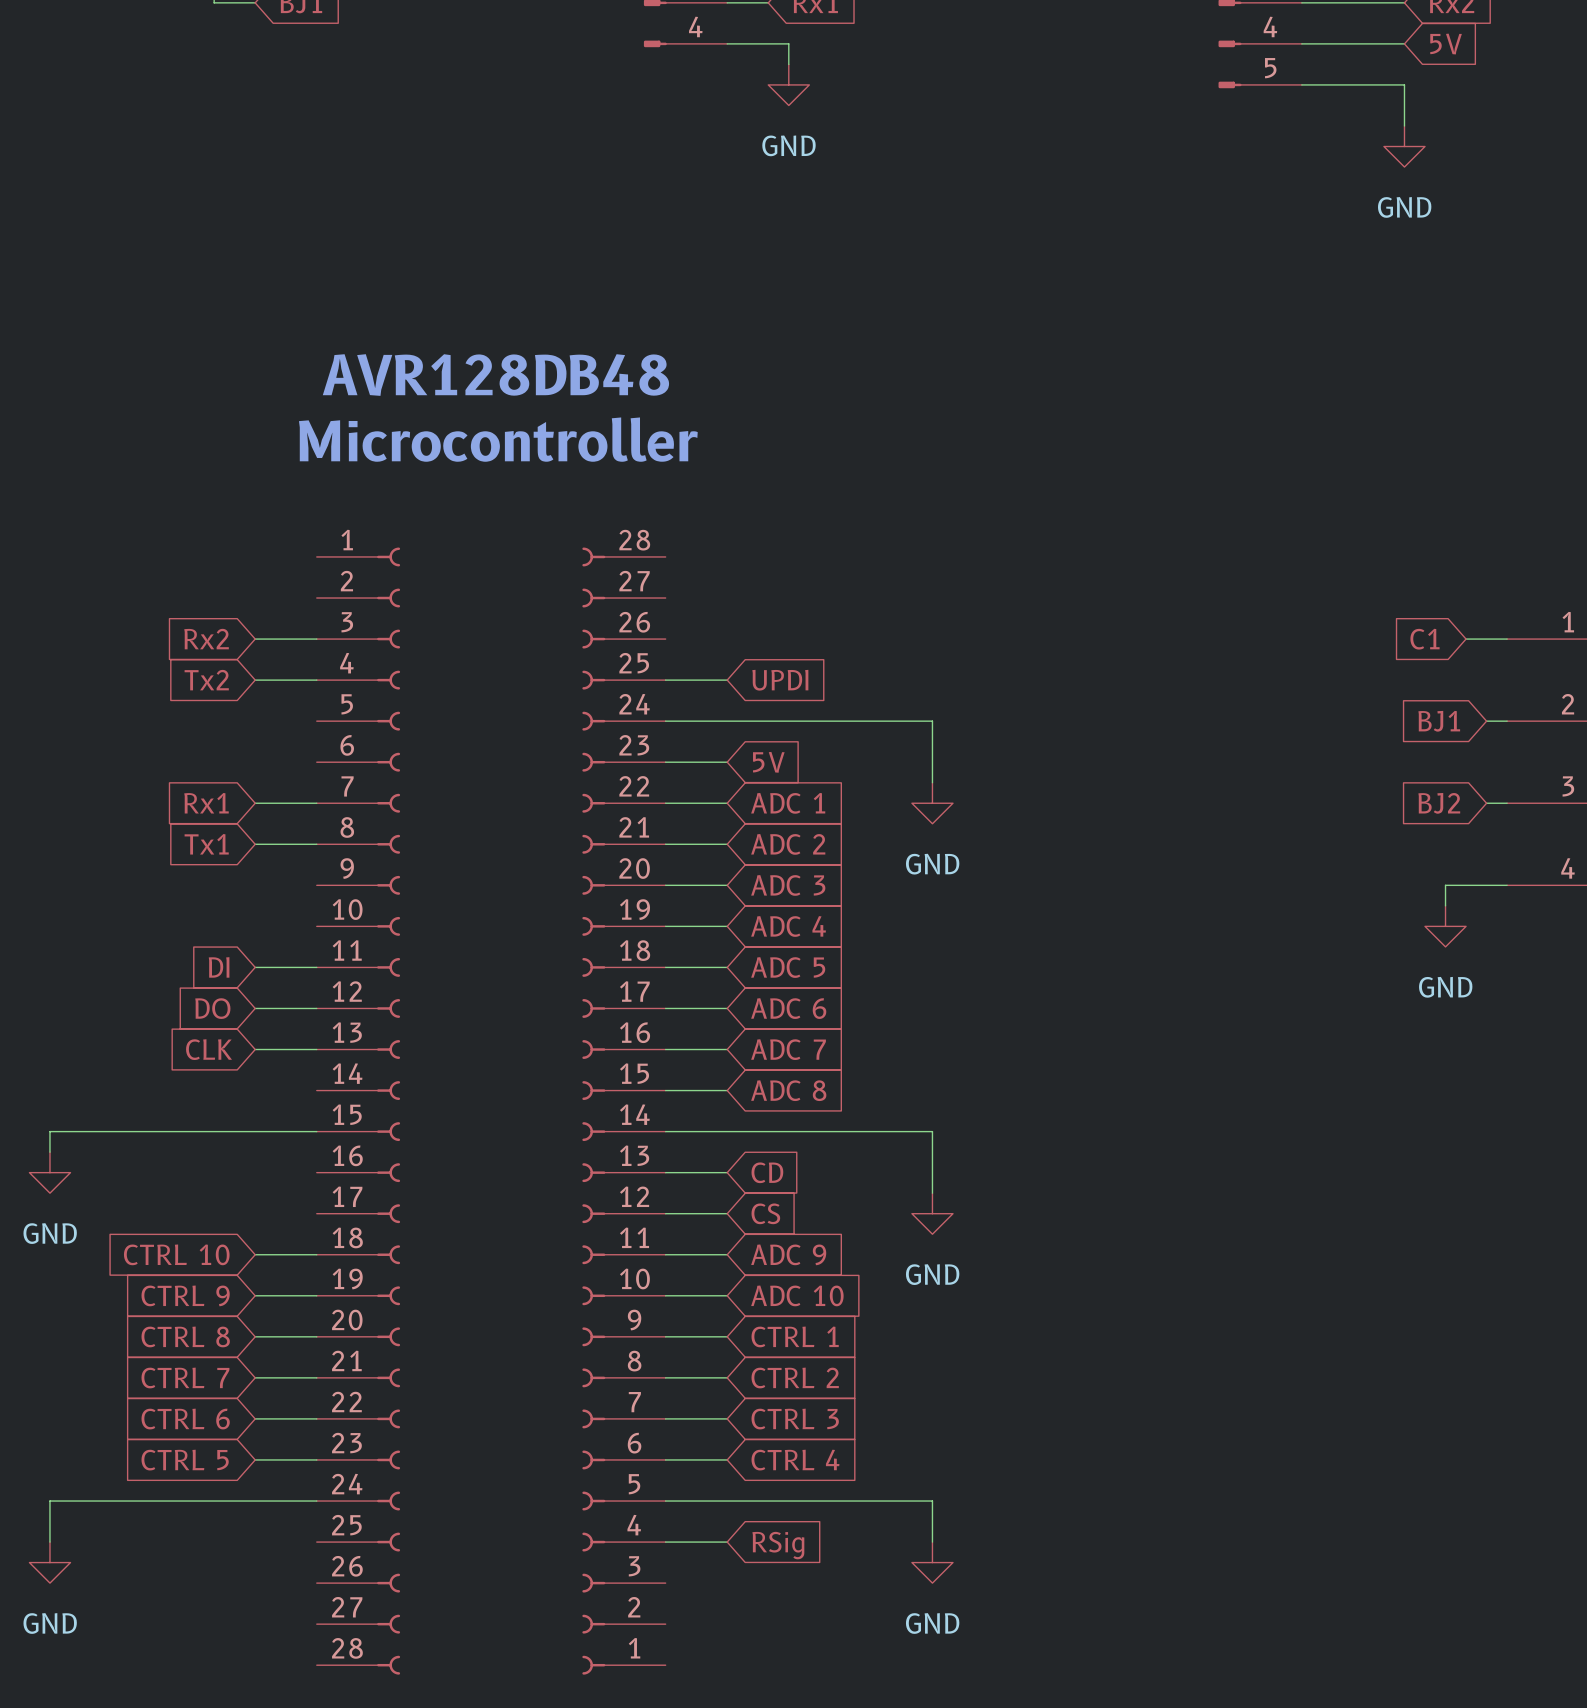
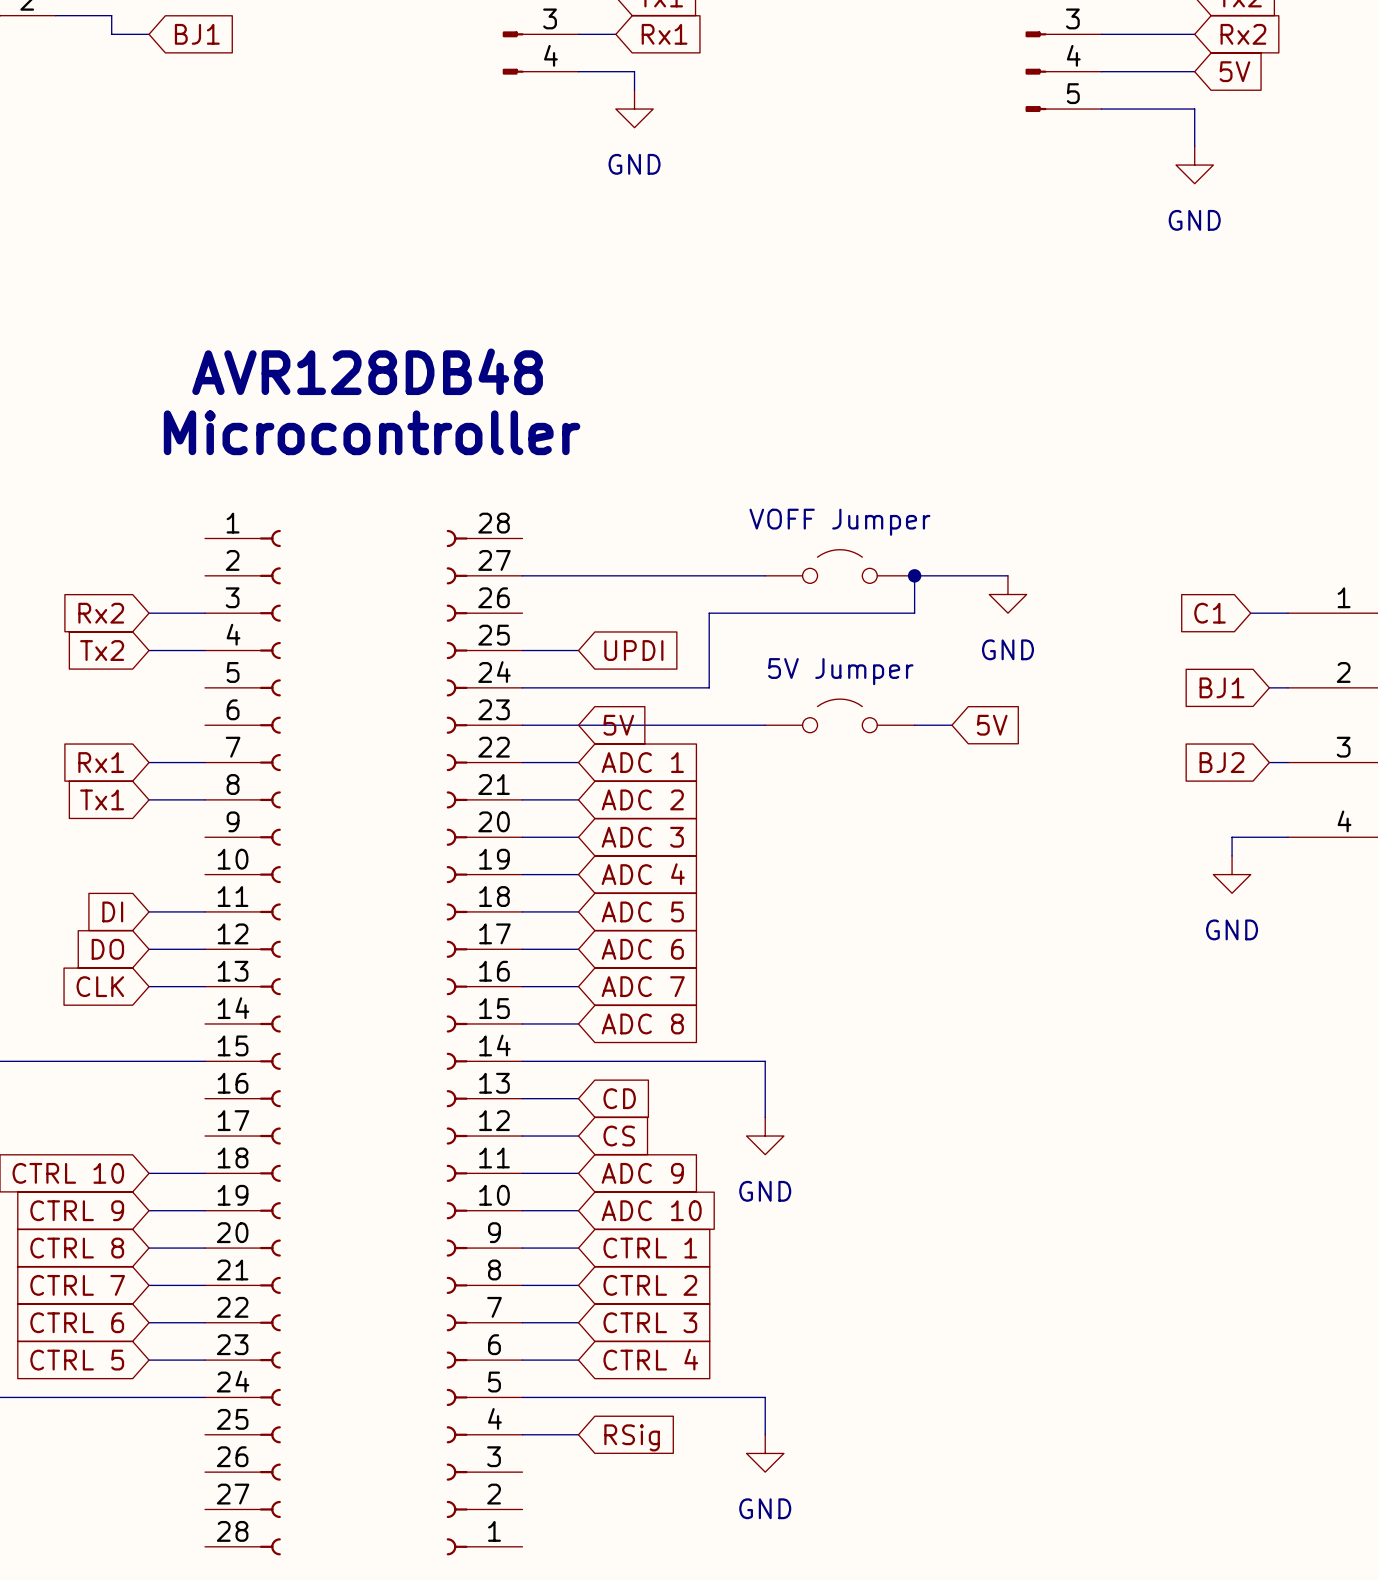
part: none -> VOFF Jumper (839, 566)
wire: none -> (522, 575) (765, 575)
junction: none -> (914, 575)
wire: (870, 721) (932, 721) (932, 782) -> (709, 687) (709, 613) (914, 613) (914, 575) (1007, 575)
part: none -> 5V Jumper (839, 715)
wire: none -> (578, 725) (765, 725)
wire: none -> (914, 725) (951, 725)
global label: none -> 5V (992, 725)
power symbol position: GND (932, 803) -> GND (1007, 594)

